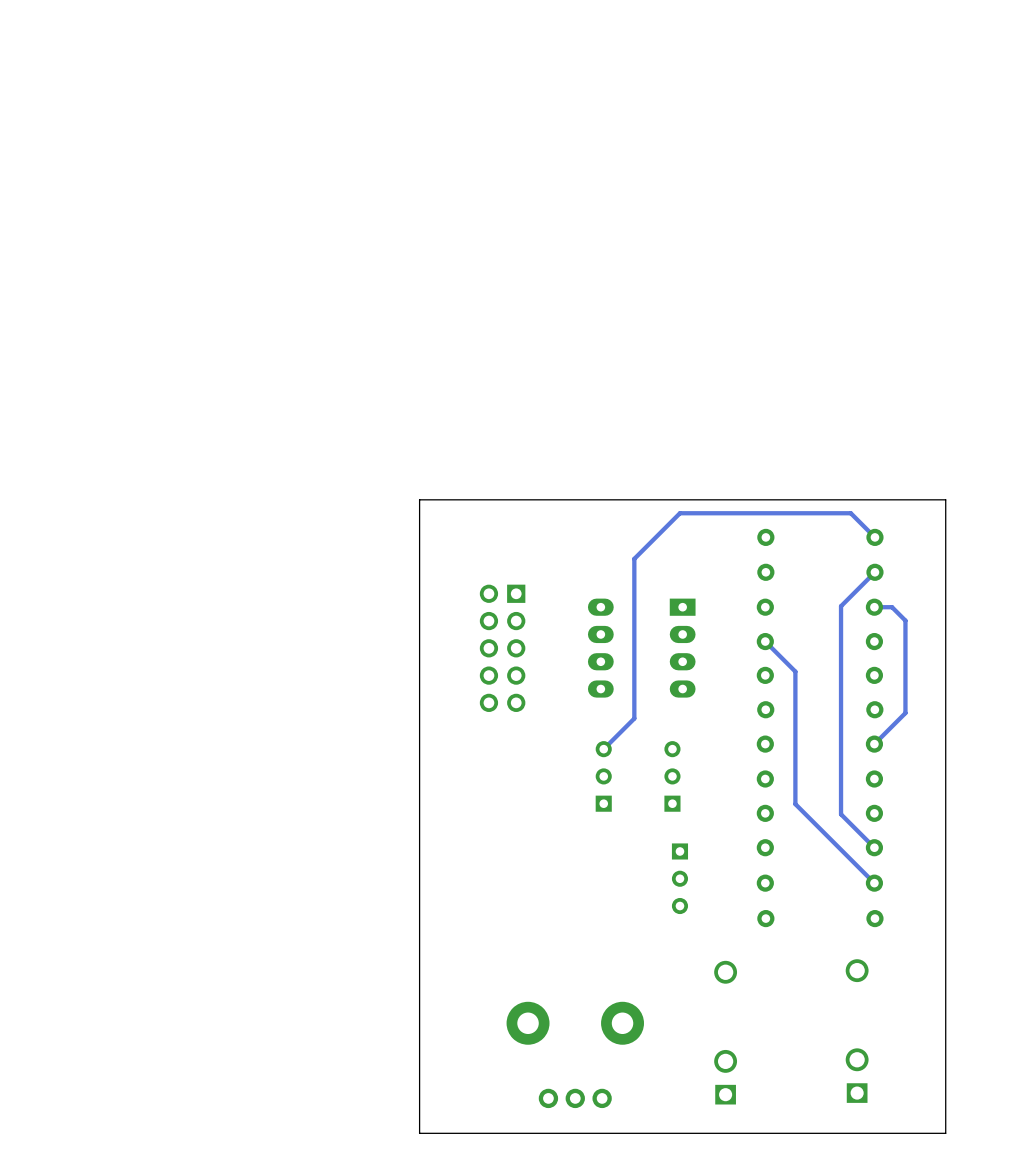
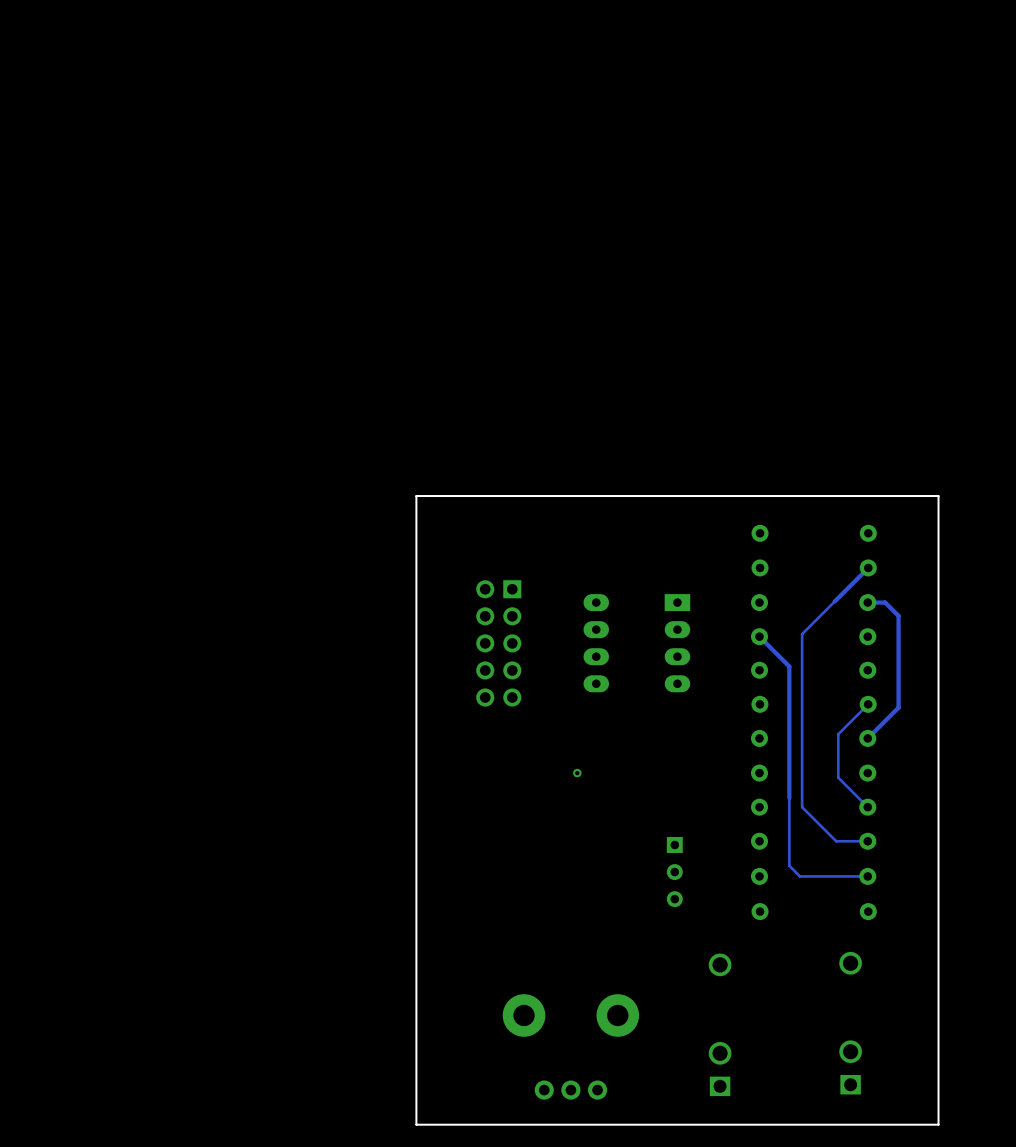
track: (874, 537) (850, 513) (679, 513) (634, 558) (634, 718) (603, 749) -> none
track: (841, 606) (841, 814) (874, 847) -> (834, 601) (802, 634) (802, 807) (836, 841) (867, 841)
track: none -> (868, 704) (838, 734) (838, 777) (867, 807)
part: (603, 776) -> none
part: (672, 776) -> none
via: none -> (577, 773)
track: (795, 804) (874, 883) -> (789, 798) (789, 865) (800, 876) (867, 876)

